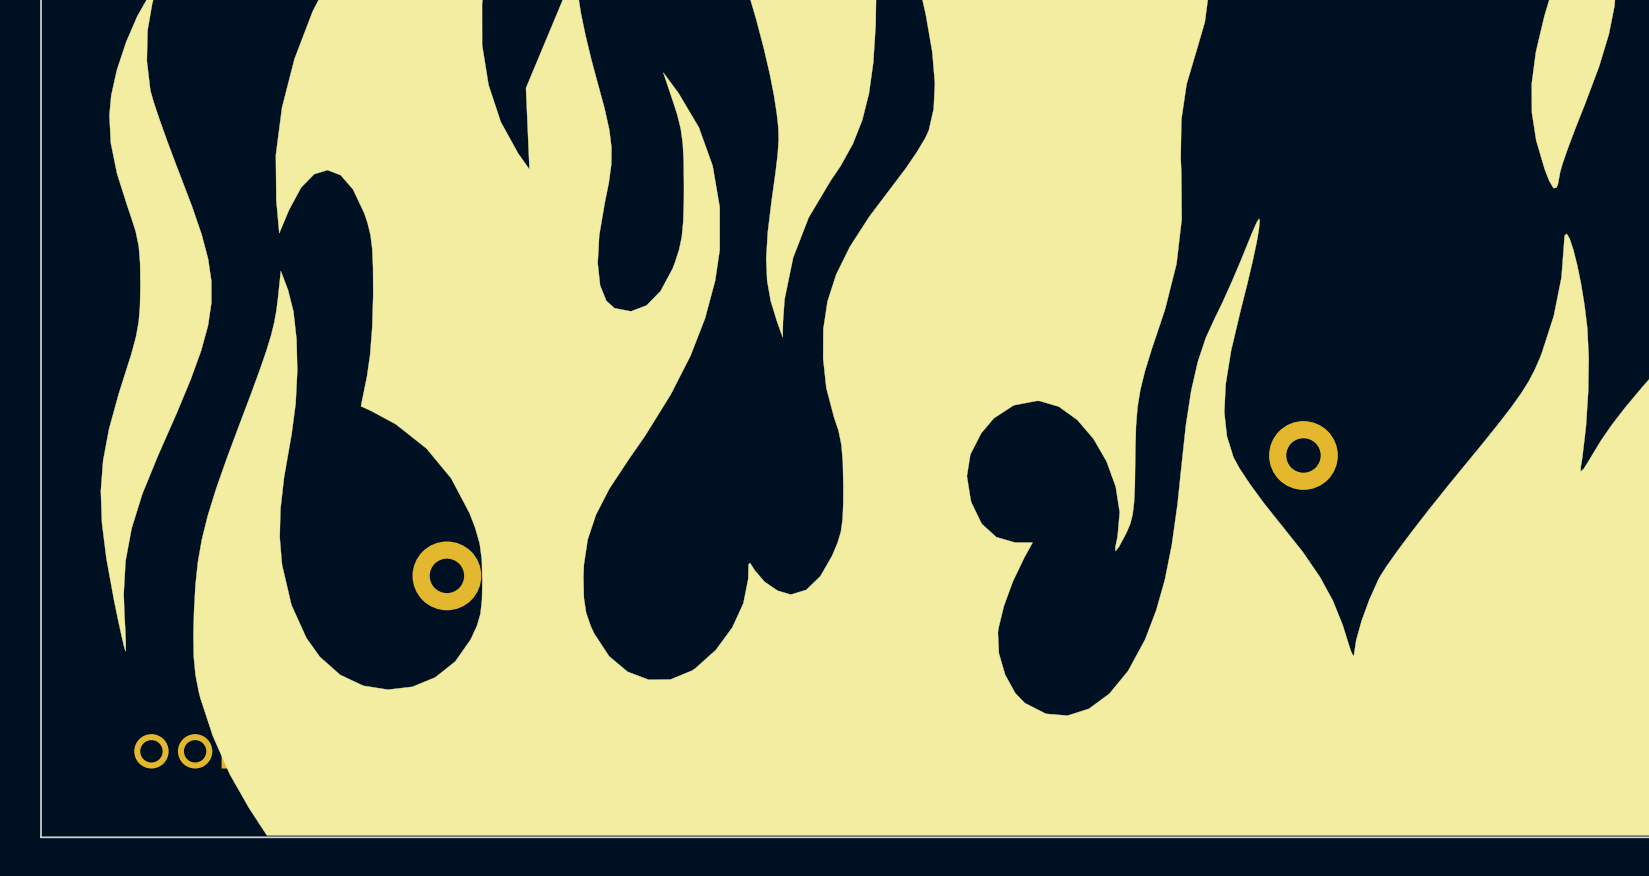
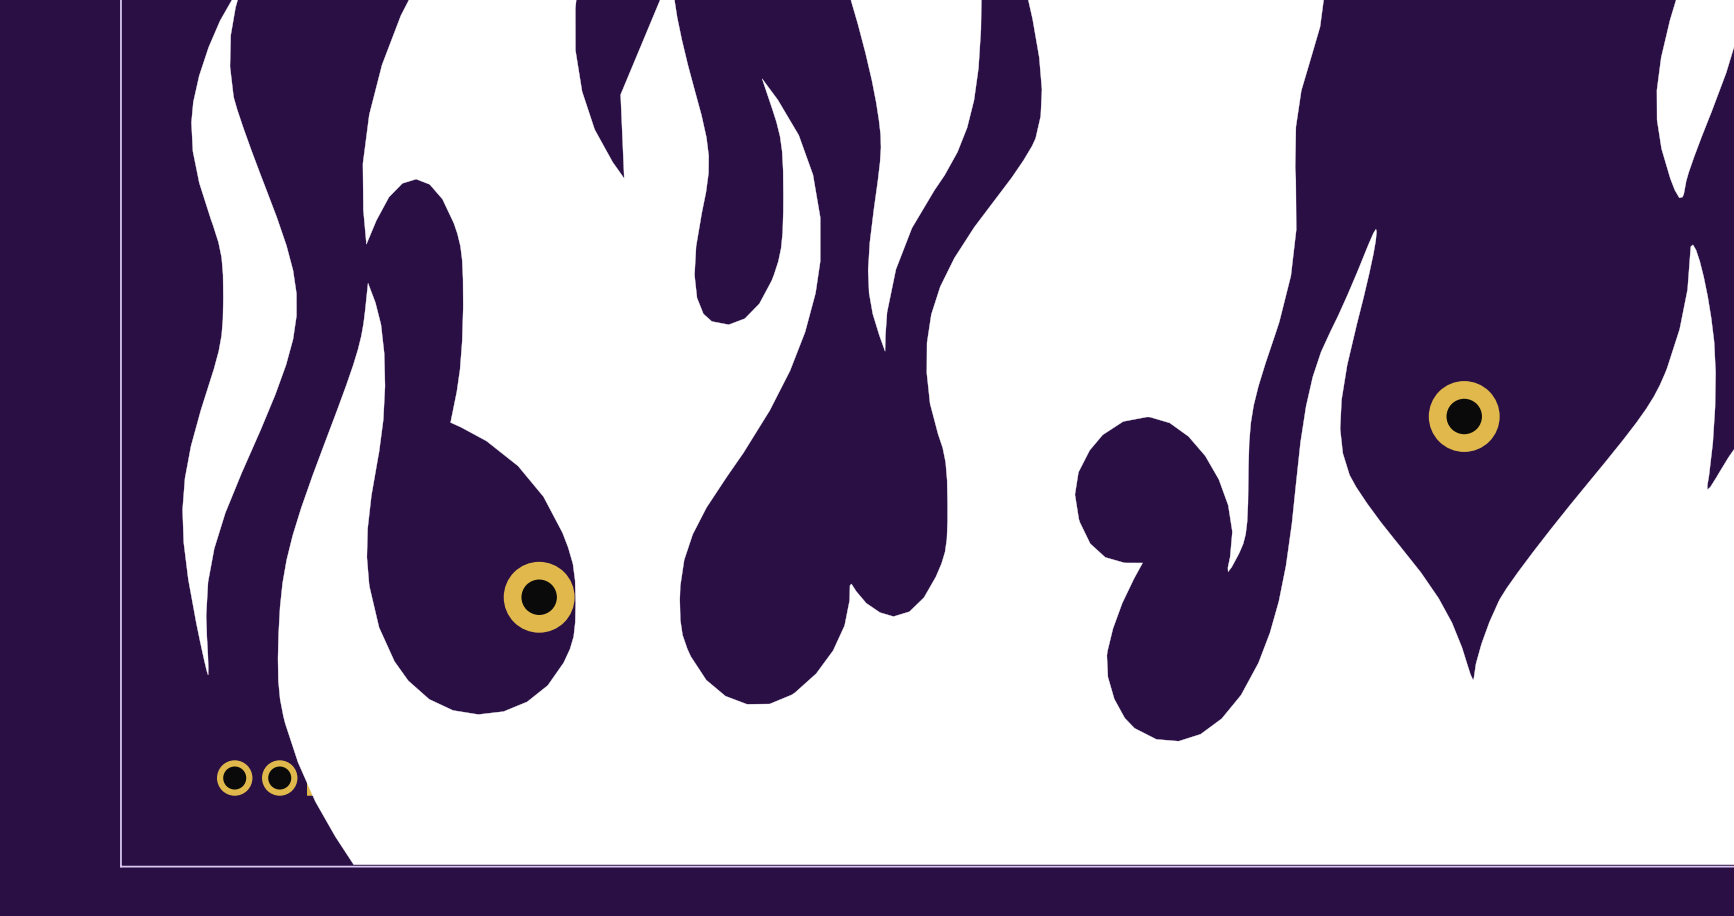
part position: (1303, 455) -> (1464, 416)

